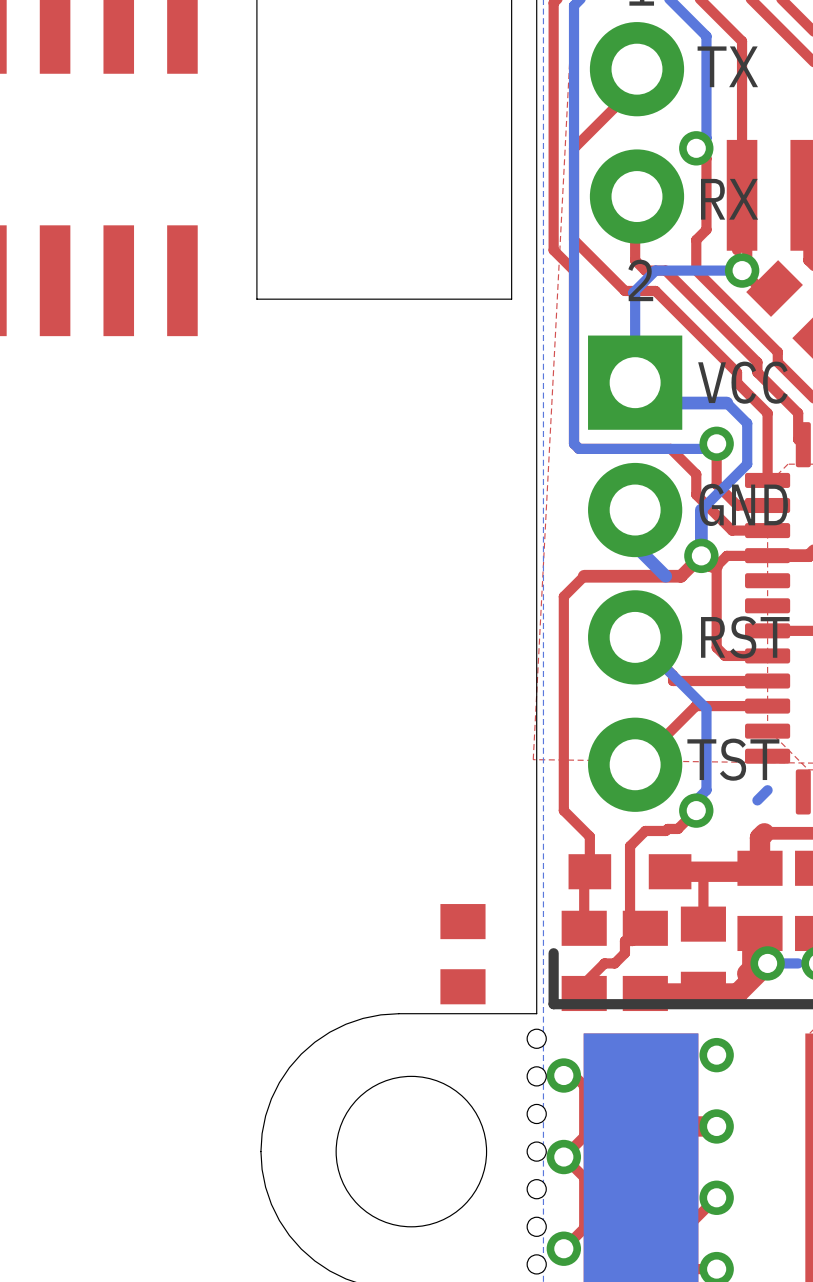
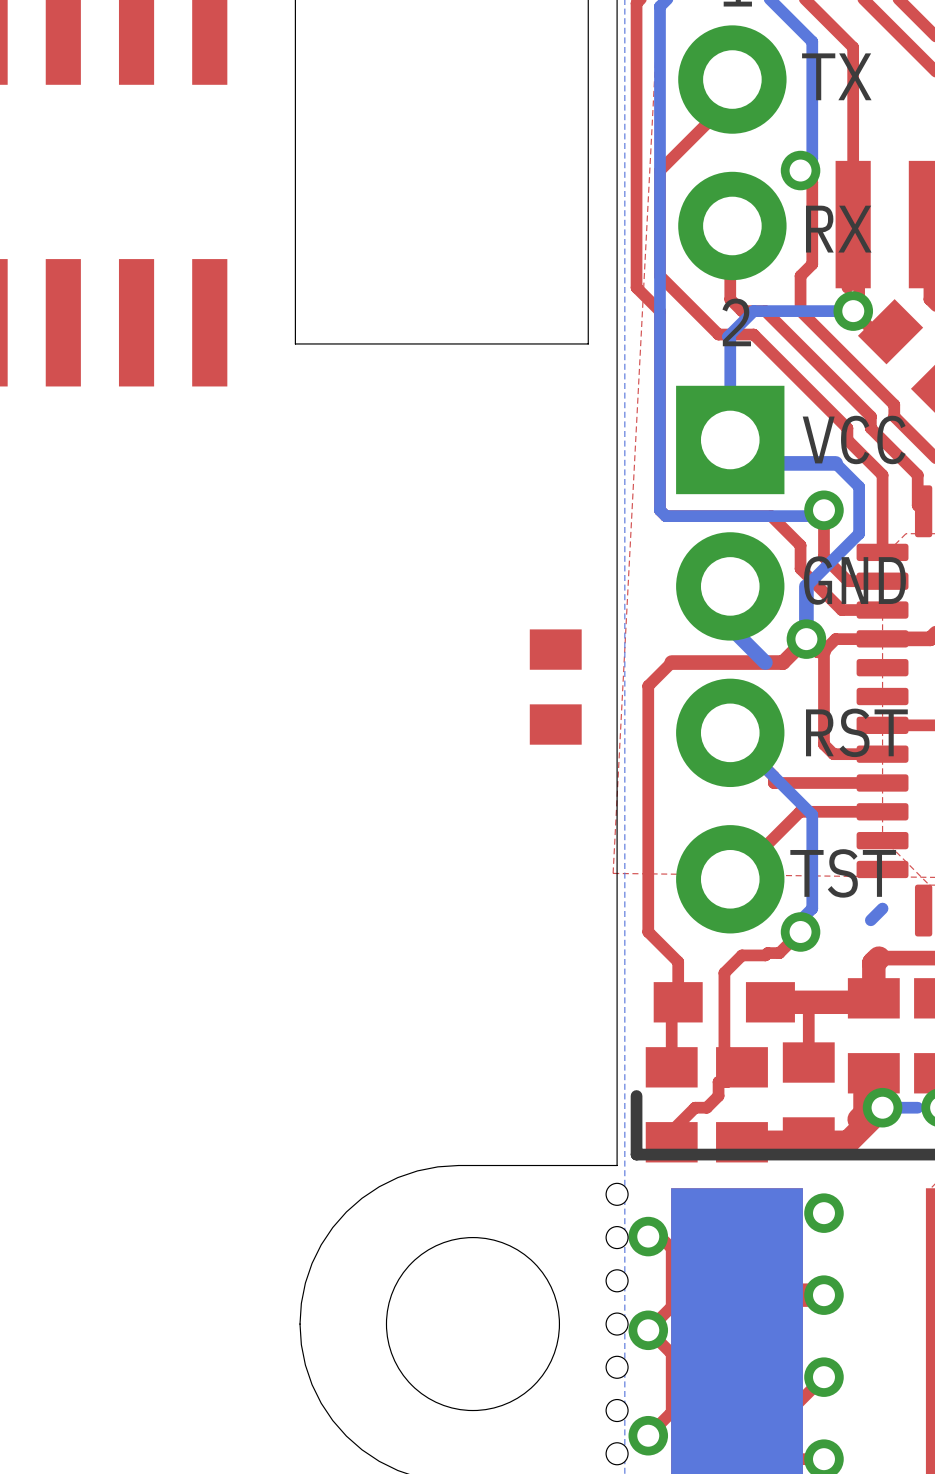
part position: (462, 954) -> (555, 687)

